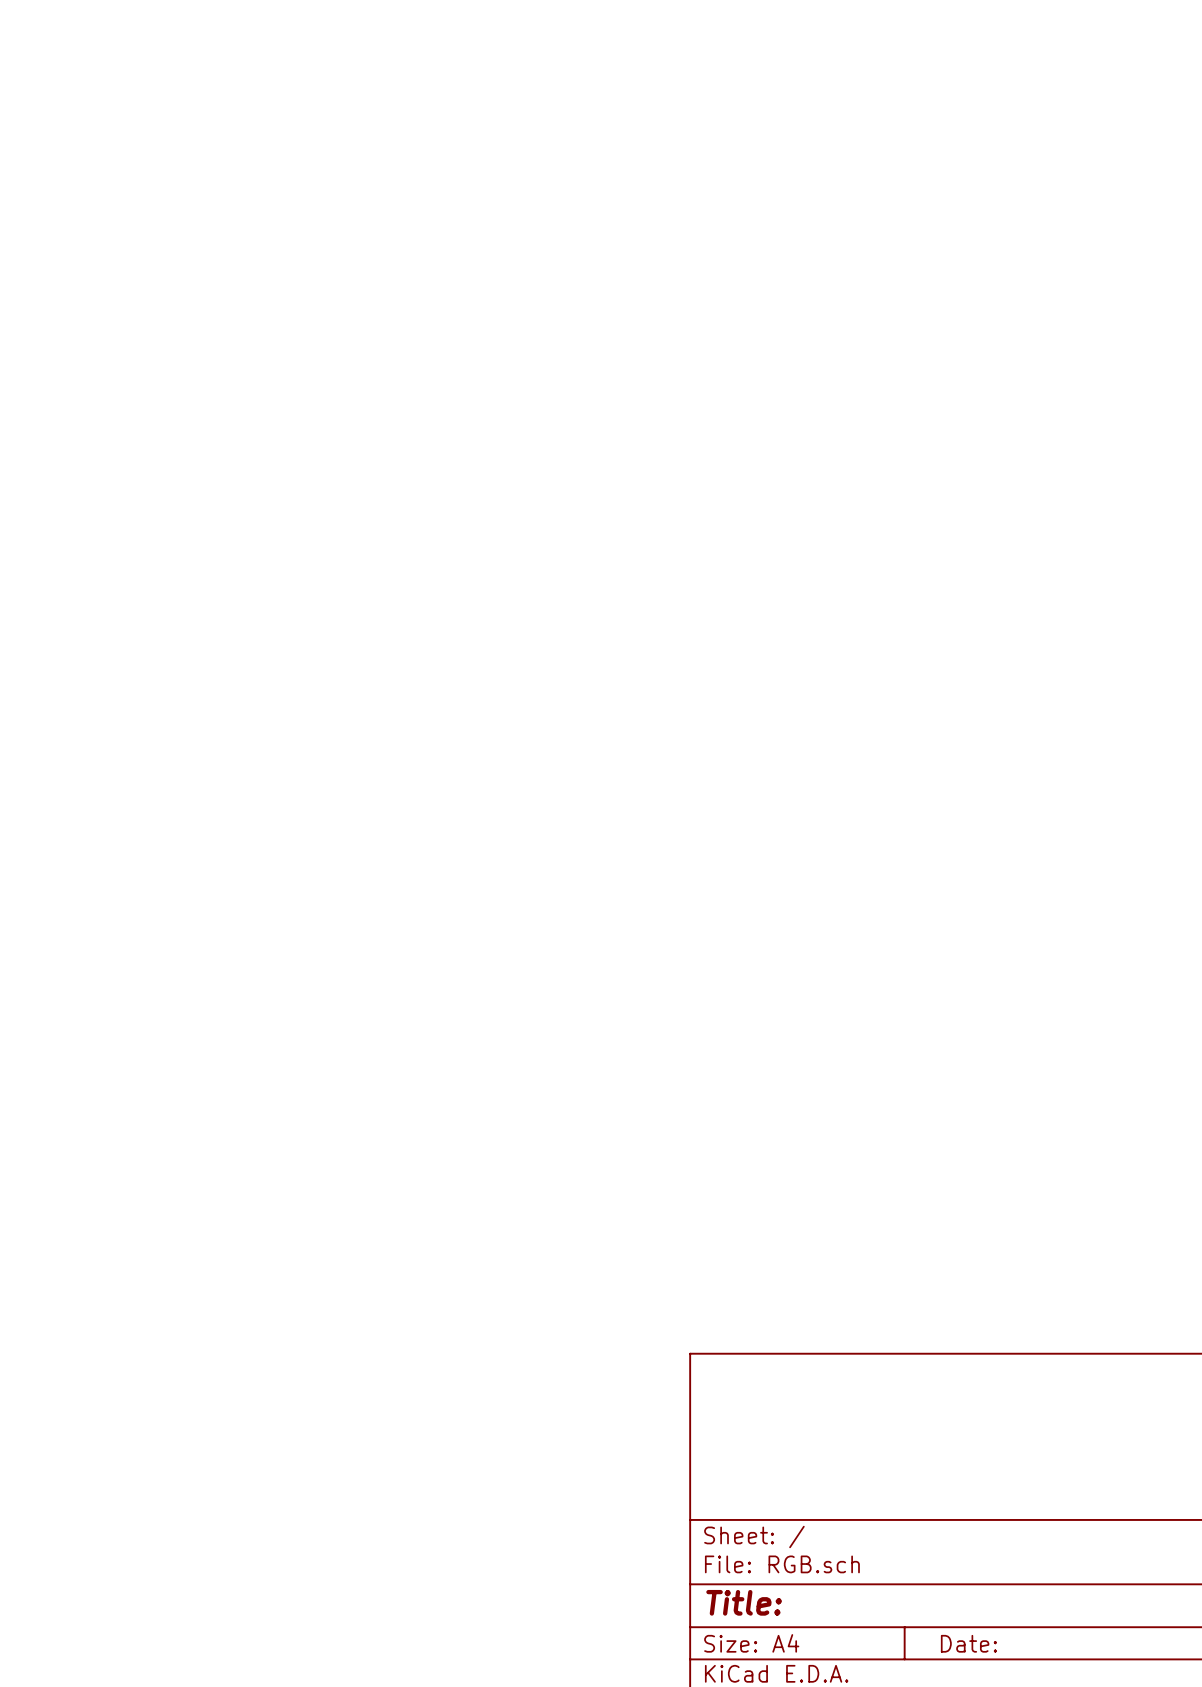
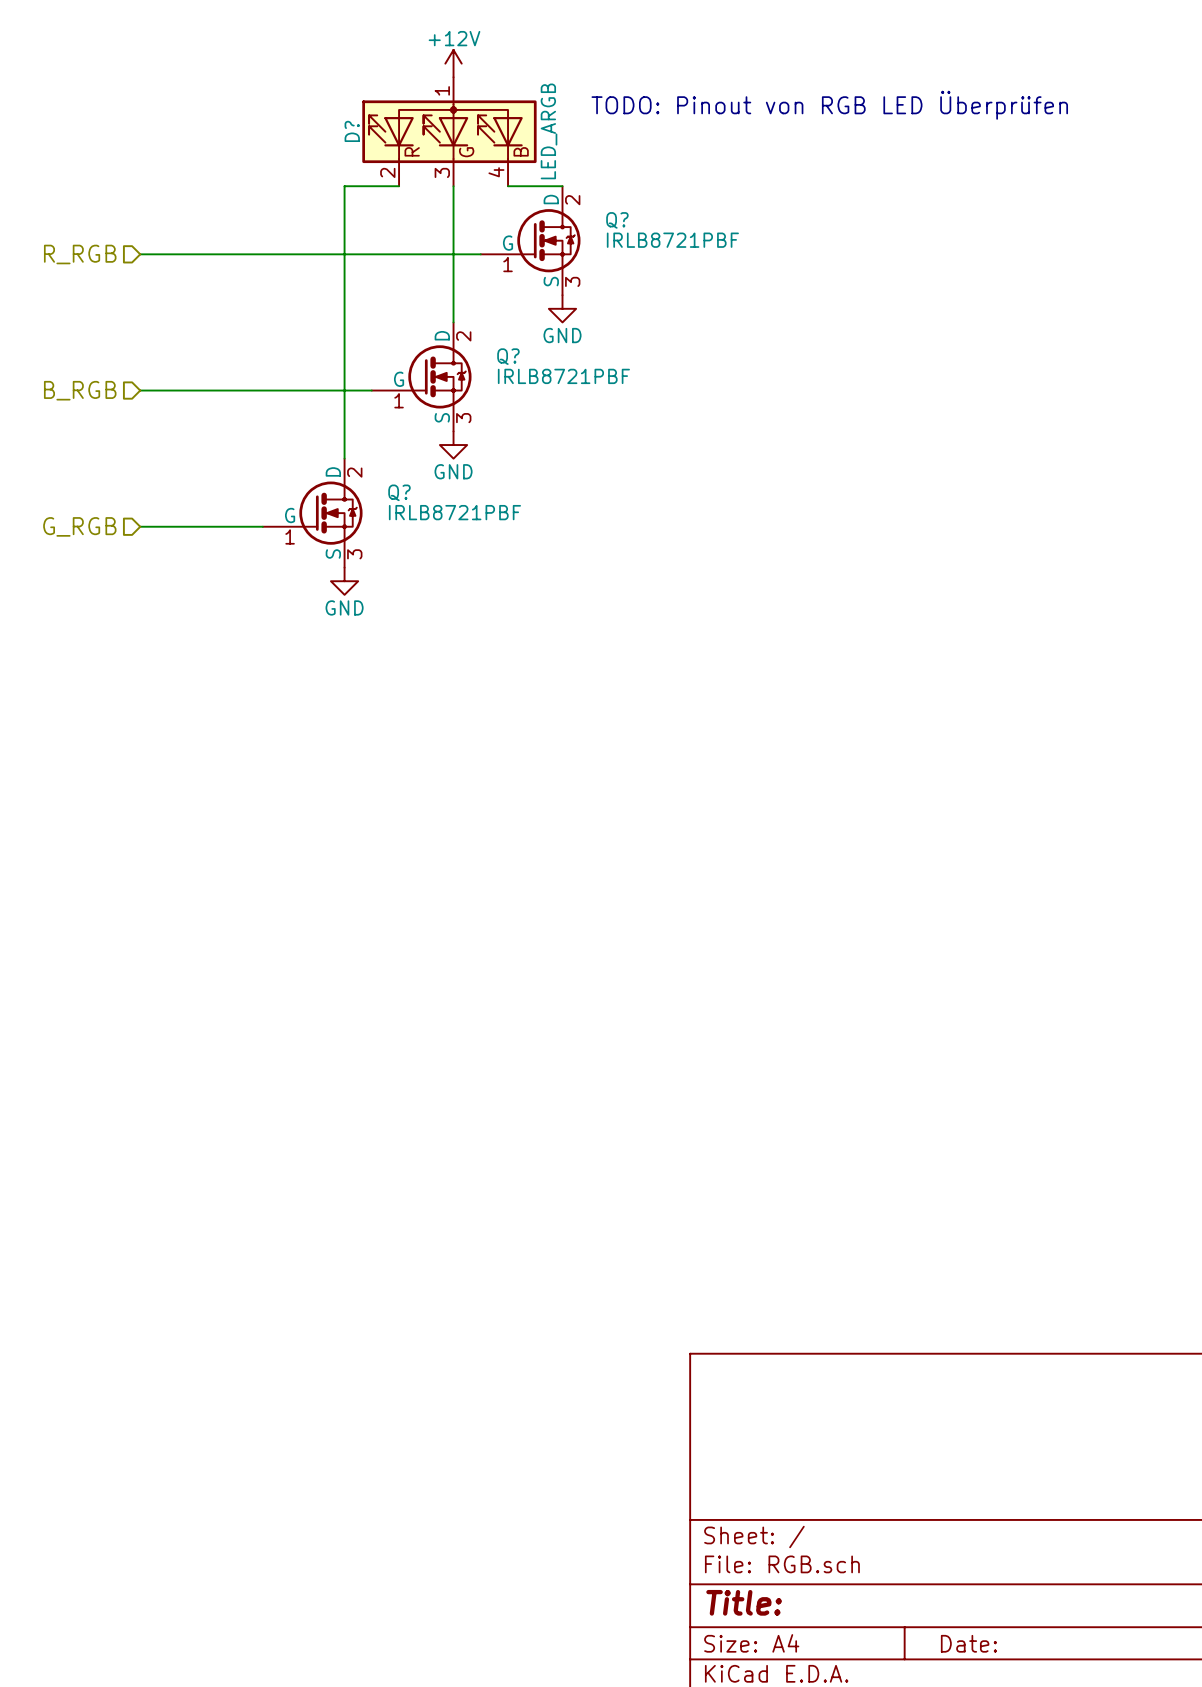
power symbol: none -> +12V (453, 63)
text: none -> TODO: Pinout von RGB LED Überprüfen (829, 105)
D?: none -> LED_ARGB (449, 131)
wire: none -> (399, 186) (344, 186) (344, 458)
wire: none -> (453, 186) (453, 322)
wire: none -> (508, 186) (562, 186)
Q?: none -> IRLB8721PBF (530, 240)
hierarchical label: none -> R_RGB (80, 254)
wire: none -> (140, 254) (480, 254)
power symbol: none -> GND (562, 308)
Q?: none -> IRLB8721PBF (421, 376)
hierarchical label: none -> B_RGB (80, 390)
wire: none -> (140, 390) (371, 390)
power symbol: none -> GND (453, 445)
Q?: none -> IRLB8721PBF (312, 513)
hierarchical label: none -> G_RGB (79, 526)
wire: none -> (140, 526) (262, 526)
power symbol: none -> GND (344, 581)

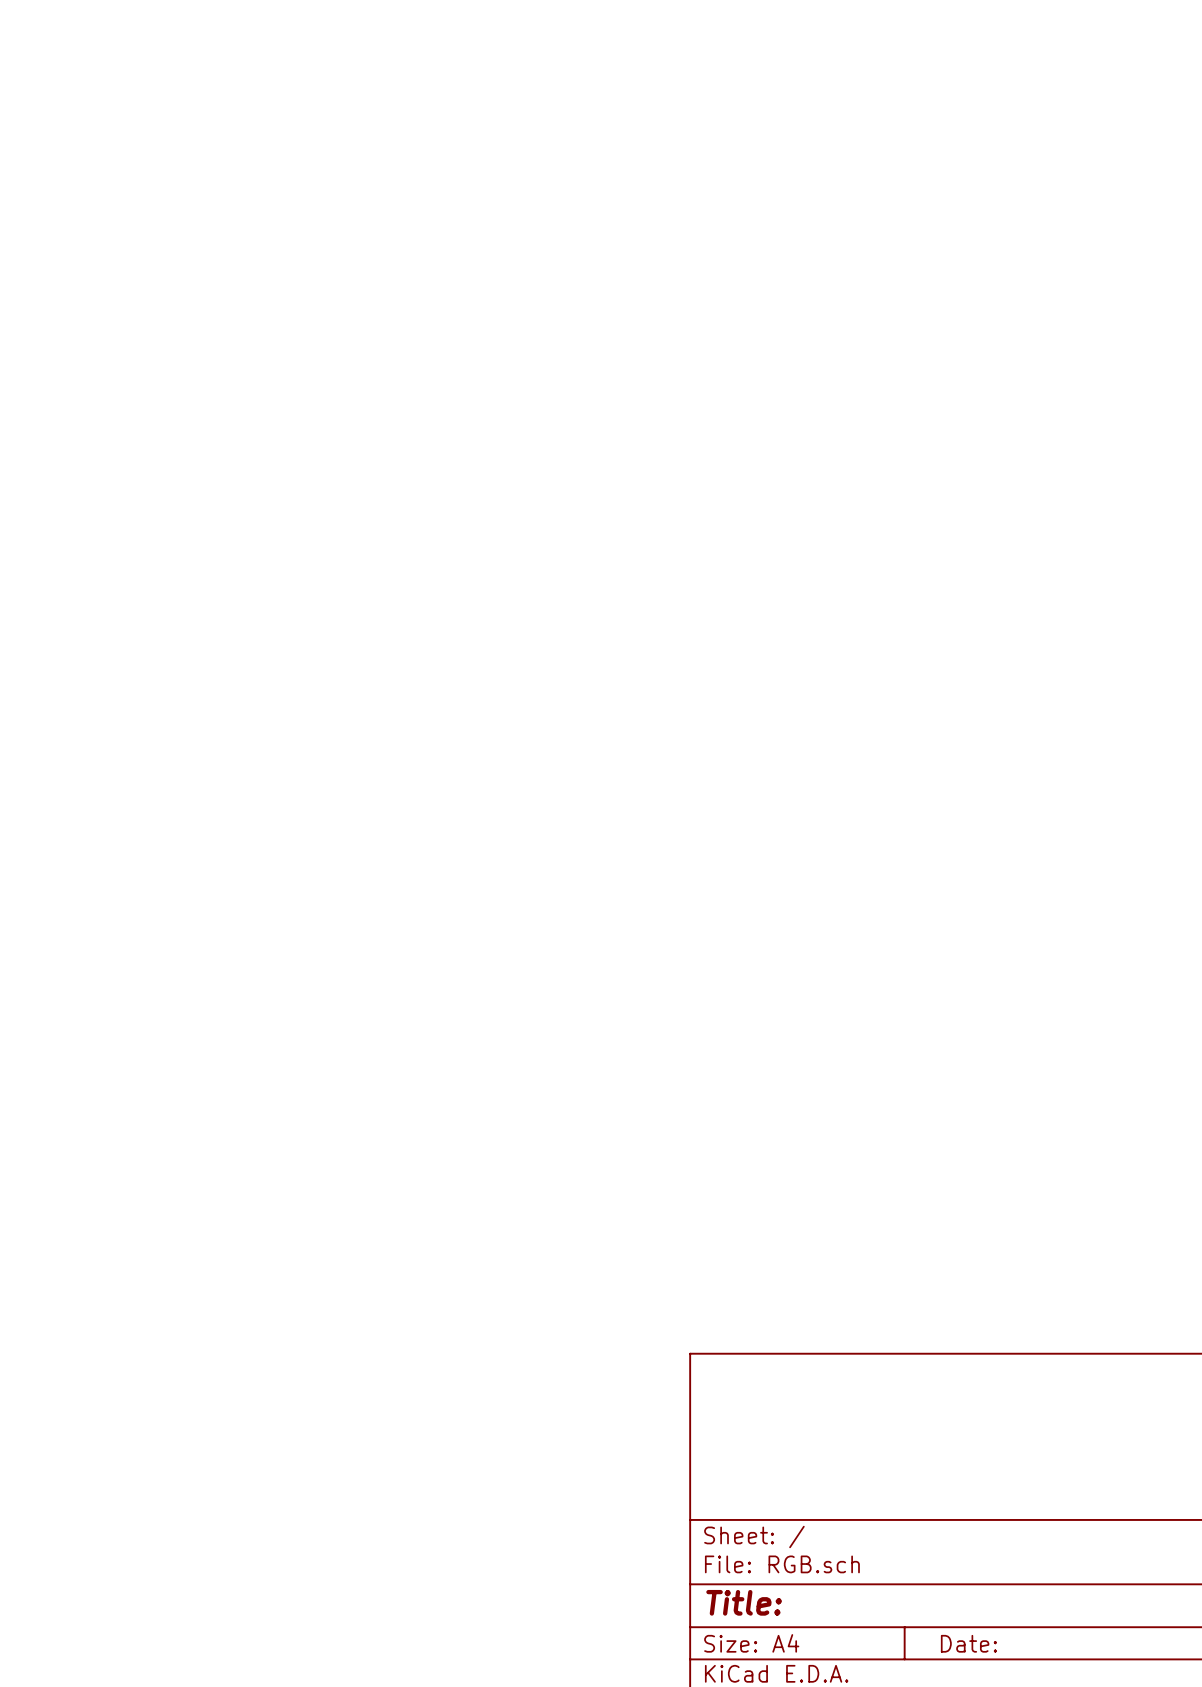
power symbol: +12V (453, 63) -> none
text: TODO: Pinout von RGB LED Überprüfen (829, 105) -> none
D?: LED_ARGB (449, 131) -> none
wire: (399, 186) (344, 186) (344, 458) -> none
wire: (453, 186) (453, 322) -> none
wire: (508, 186) (562, 186) -> none
Q?: IRLB8721PBF (530, 240) -> none
hierarchical label: R_RGB (80, 254) -> none
wire: (140, 254) (480, 254) -> none
power symbol: GND (562, 308) -> none
Q?: IRLB8721PBF (421, 376) -> none
hierarchical label: B_RGB (80, 390) -> none
wire: (140, 390) (371, 390) -> none
power symbol: GND (453, 445) -> none
Q?: IRLB8721PBF (312, 513) -> none
hierarchical label: G_RGB (79, 526) -> none
wire: (140, 526) (262, 526) -> none
power symbol: GND (344, 581) -> none

